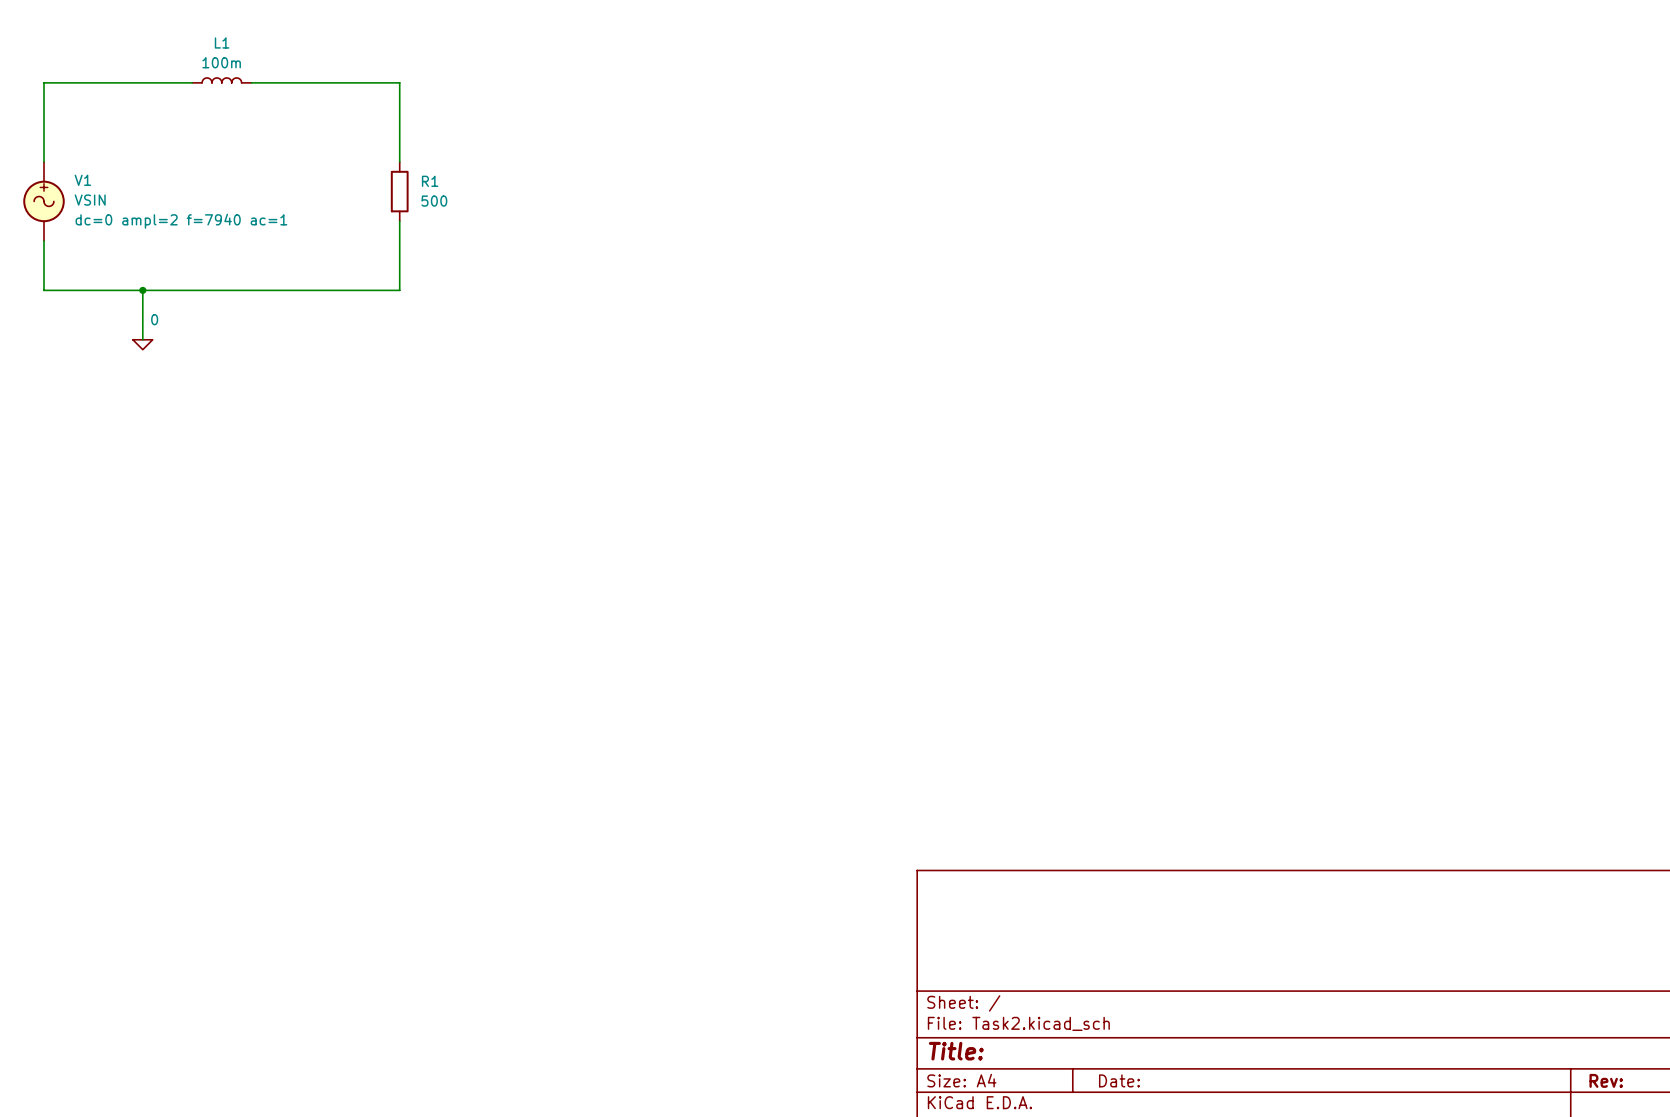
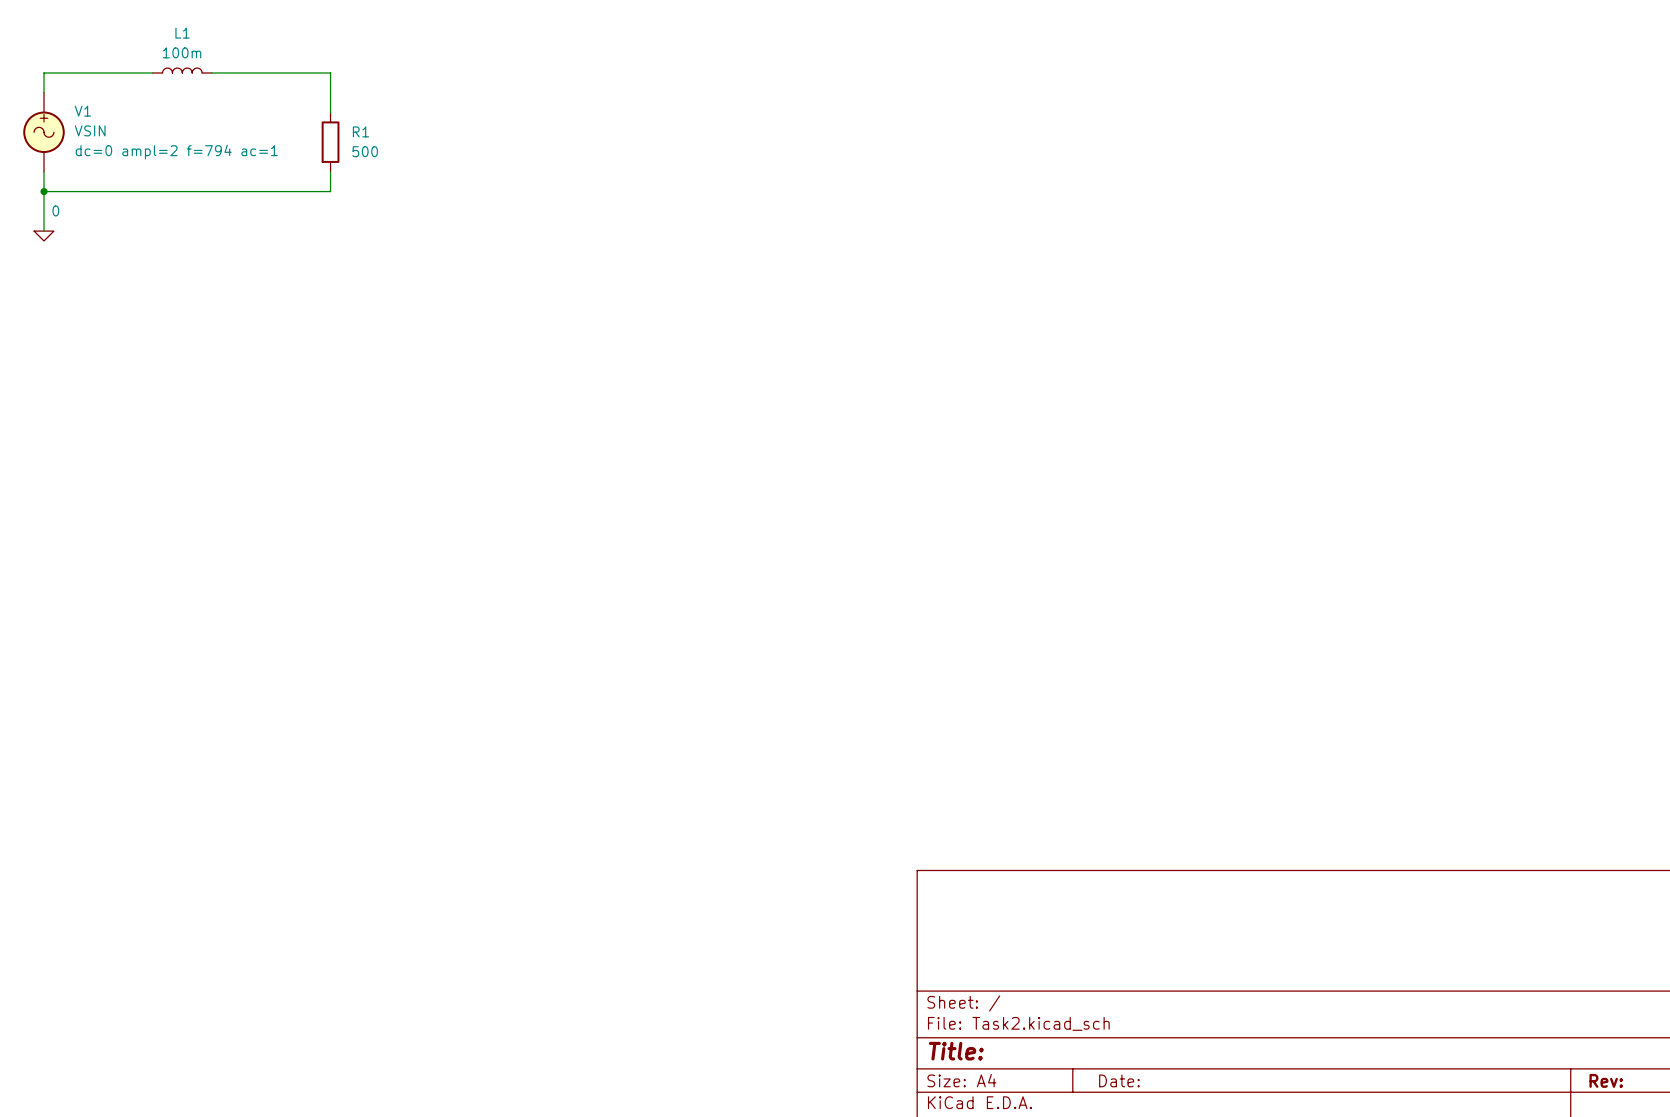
wire: none -> (211, 72) (330, 72) (330, 112)
L1 position: (221, 80) -> (182, 70)
wire: (43, 82) (192, 82) -> (43, 82) (43, 72) (152, 72)
wire: (251, 82) (399, 82) (399, 161) -> none
wire: none -> (330, 171) (330, 191) (43, 191)
junction: none -> (43, 191)
R1 position: (399, 191) -> (330, 142)
V1 position: (43, 201) -> (43, 132)
V1 text: dc=0 ampl=2 f=7940 ac=1 (181, 221) -> dc=0 ampl=2 f=794 ac=1 (176, 152)
wire: (399, 221) (399, 290) (43, 290) (43, 240) -> none
wire: (142, 290) (142, 339) -> none
junction: (142, 290) -> none
power symbol position: 0 (142, 344) -> 0 (43, 236)

